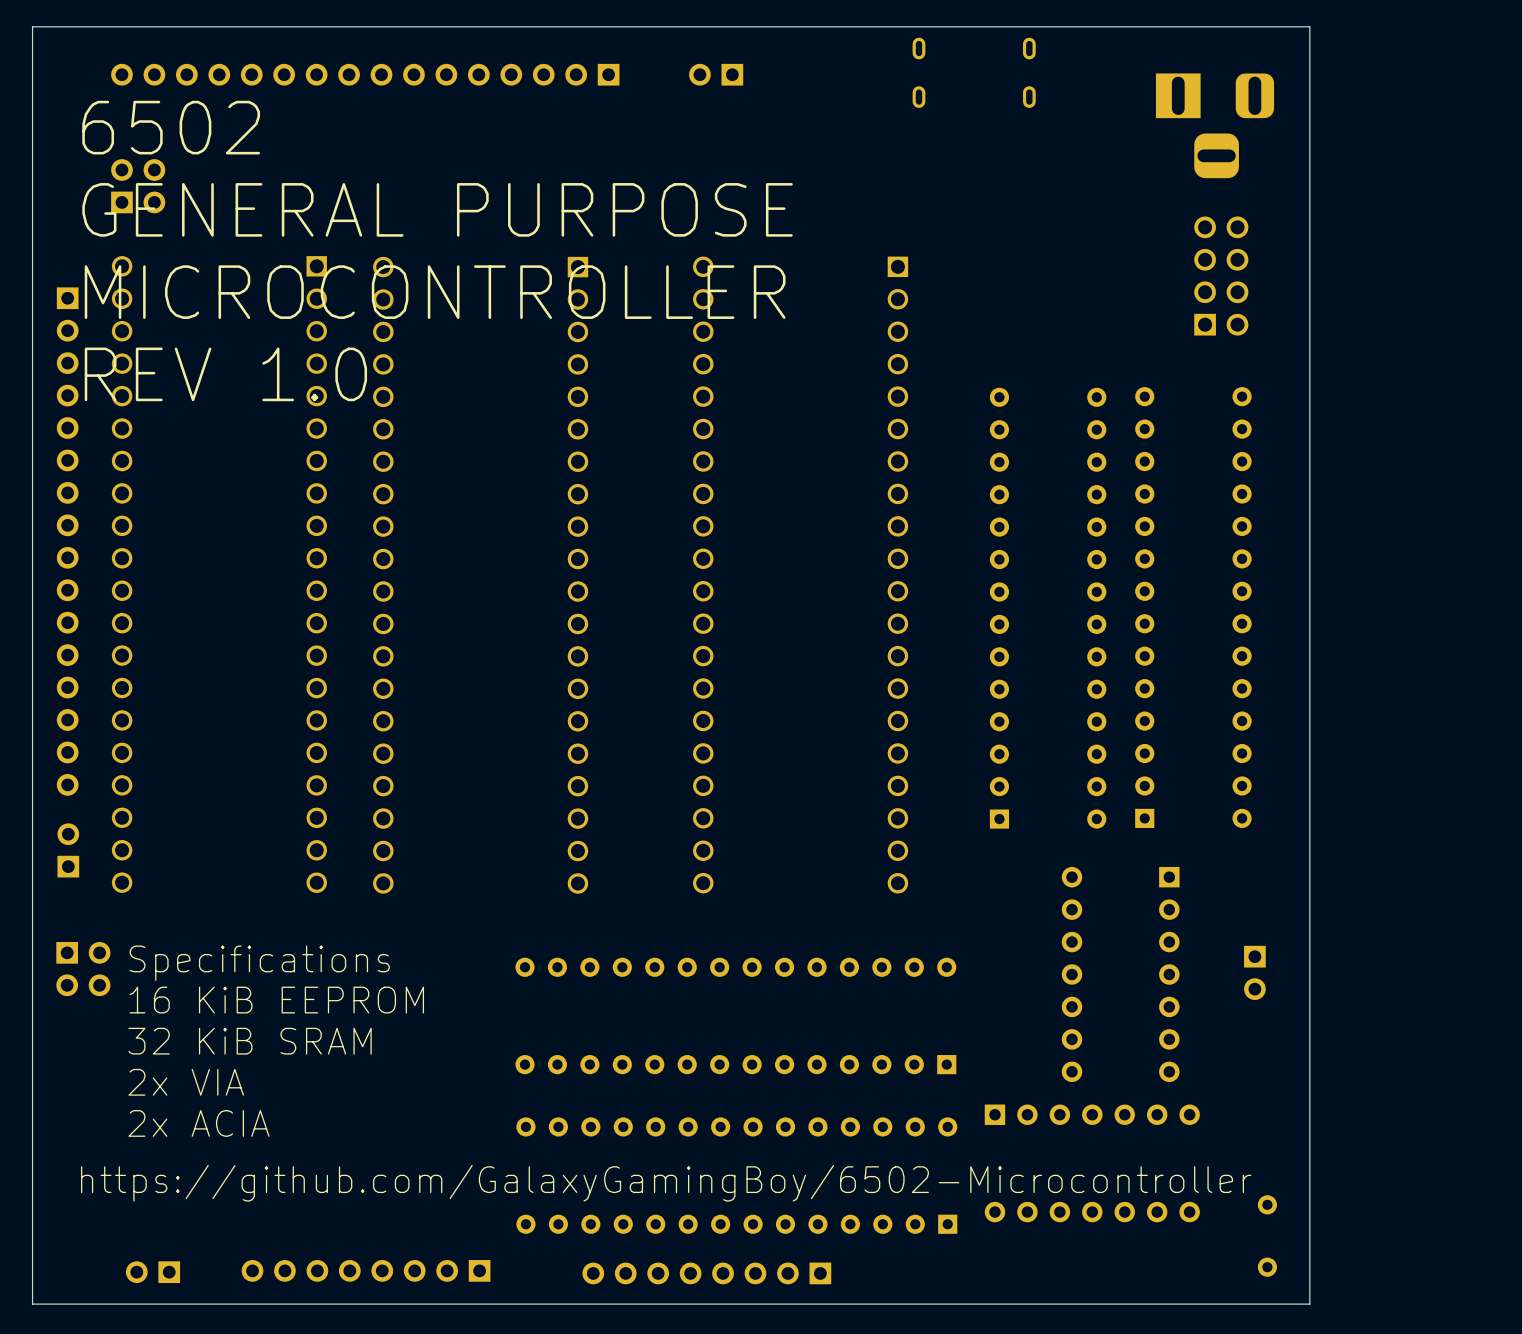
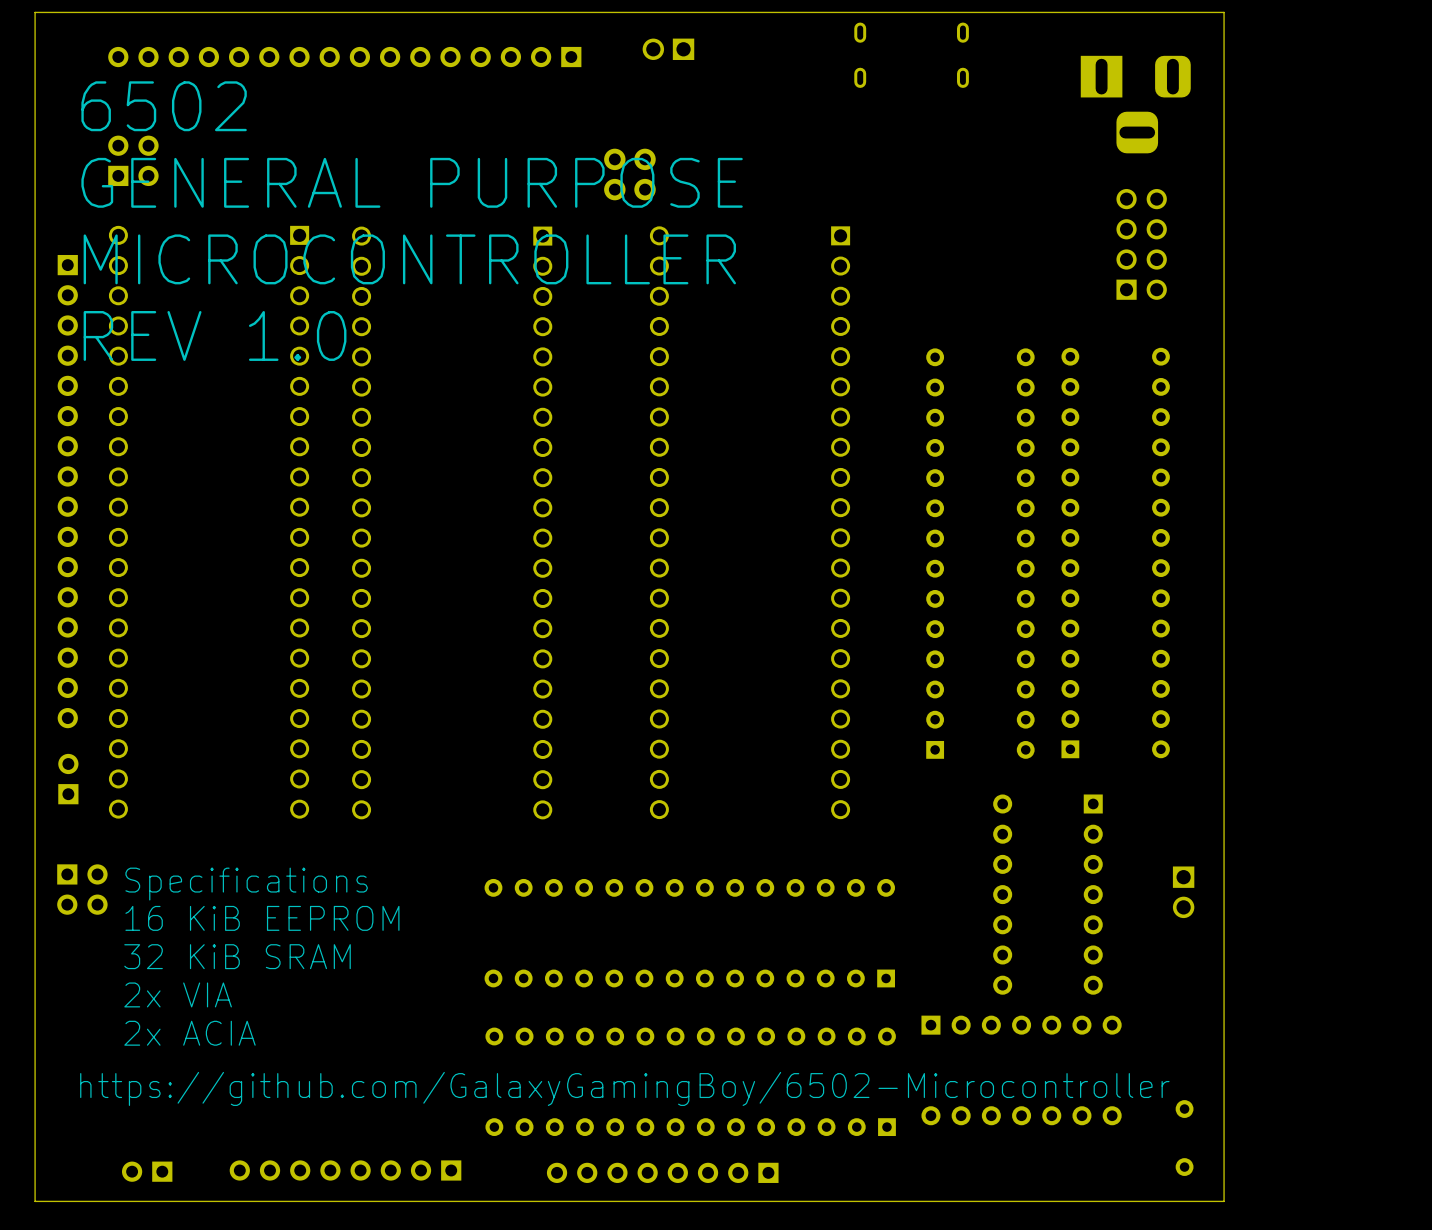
part footprint: [689, 63, 744, 86] -> [642, 38, 695, 60]
part: none -> (629, 174)
part footprint: [1244, 945, 1266, 1000] -> [1172, 866, 1195, 919]

